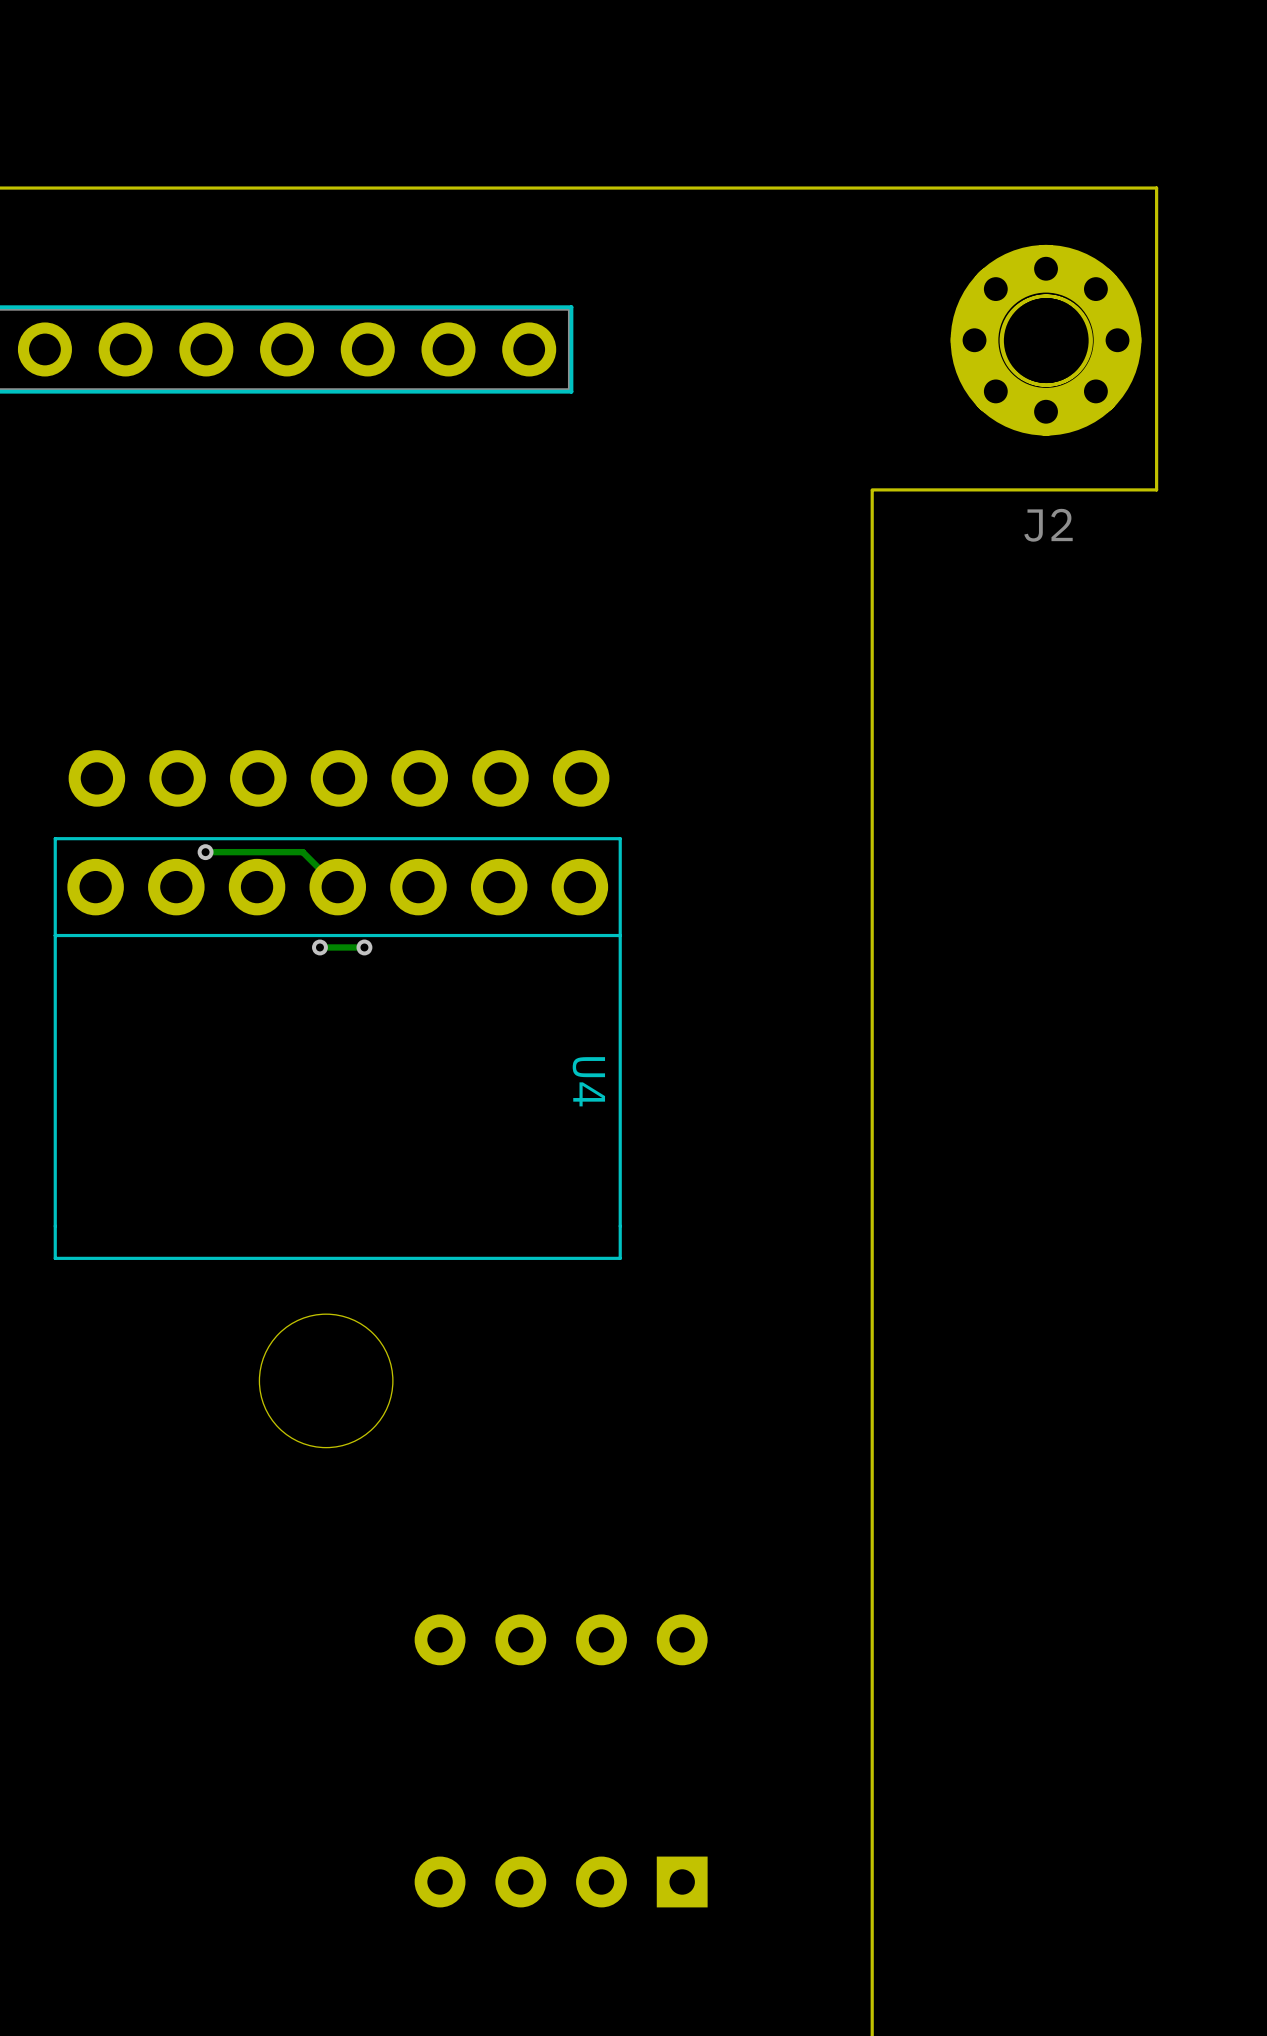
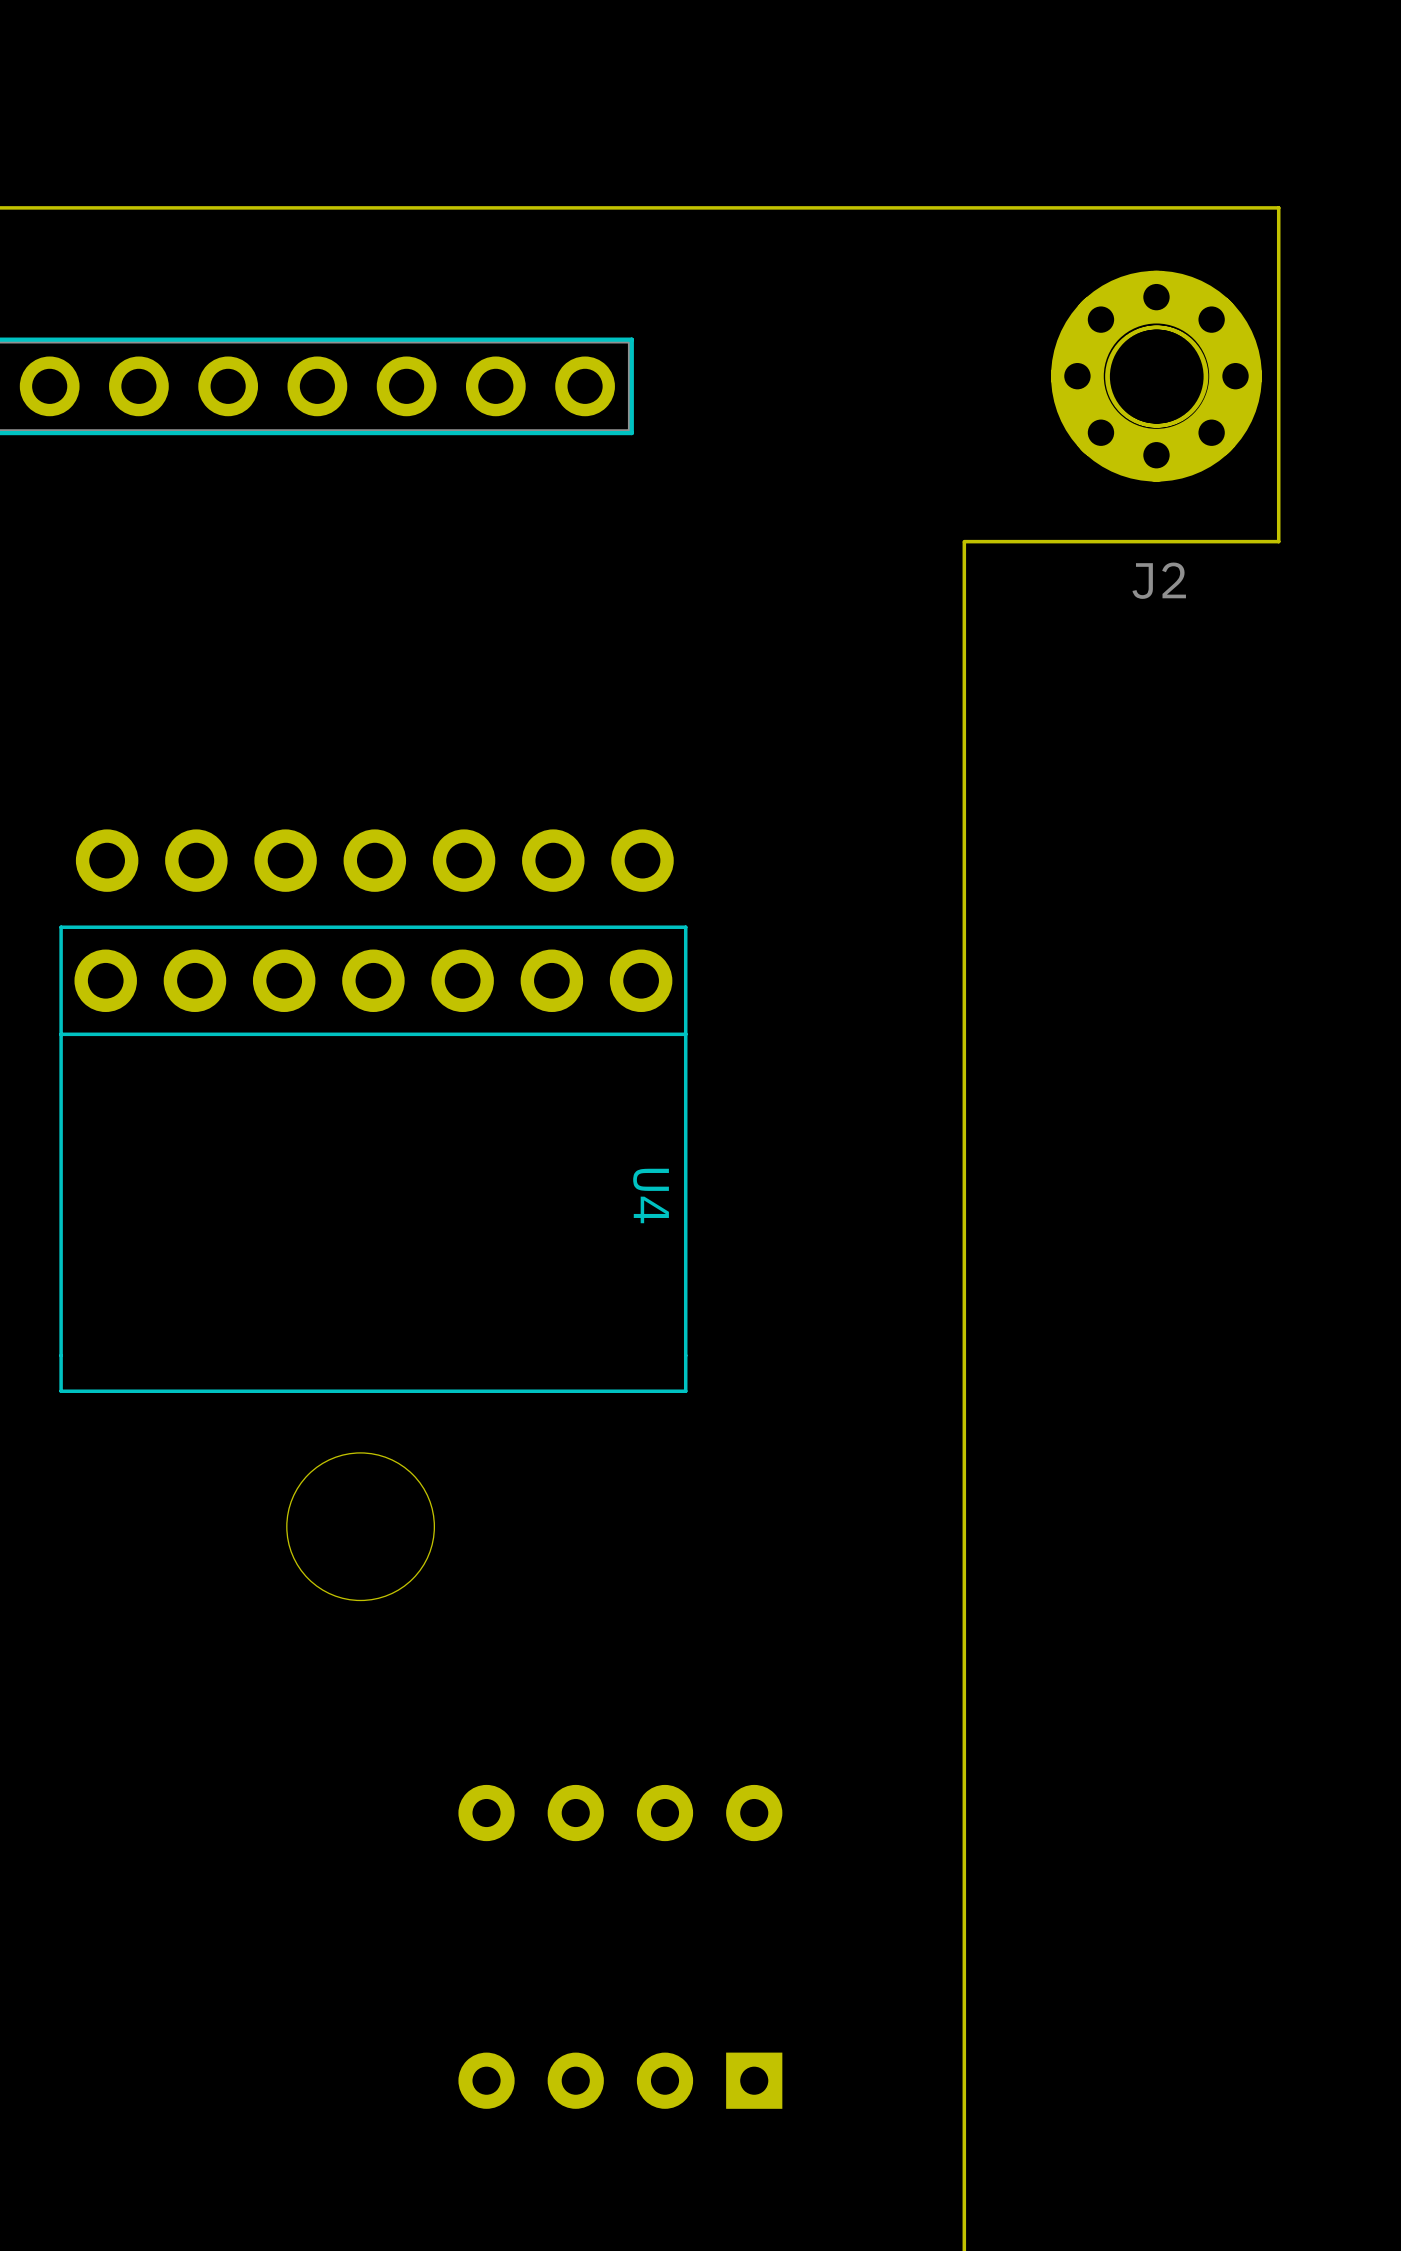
track: (205, 852) (302, 852) (337, 887) -> none
via: (205, 852) -> none
via: (319, 947) -> none
track: (364, 947) (319, 947) -> none
via: (364, 947) -> none

